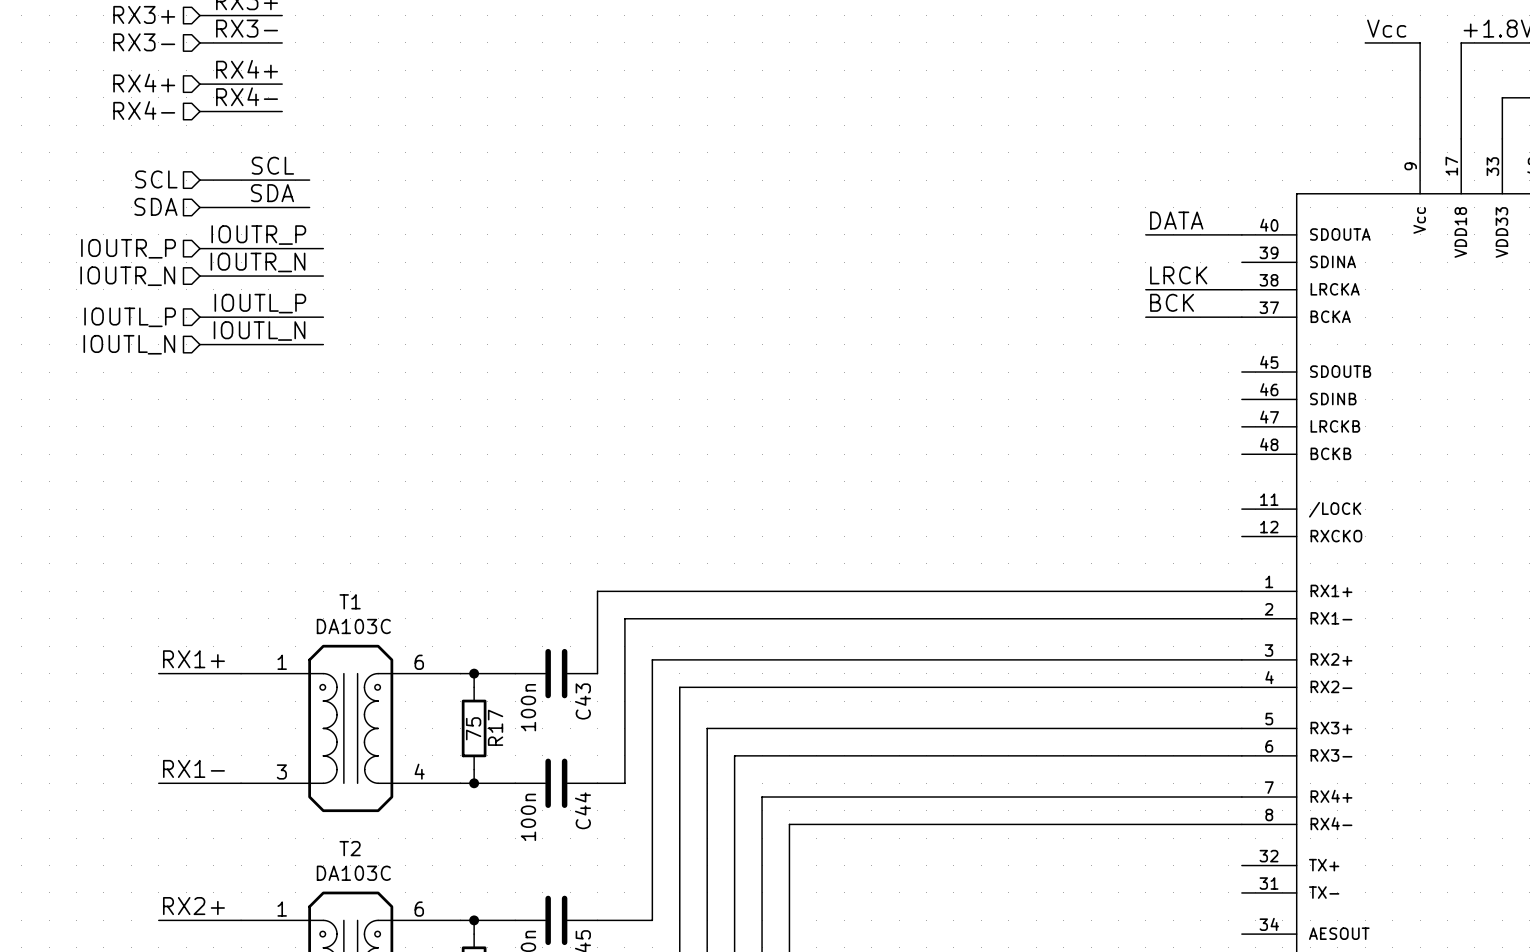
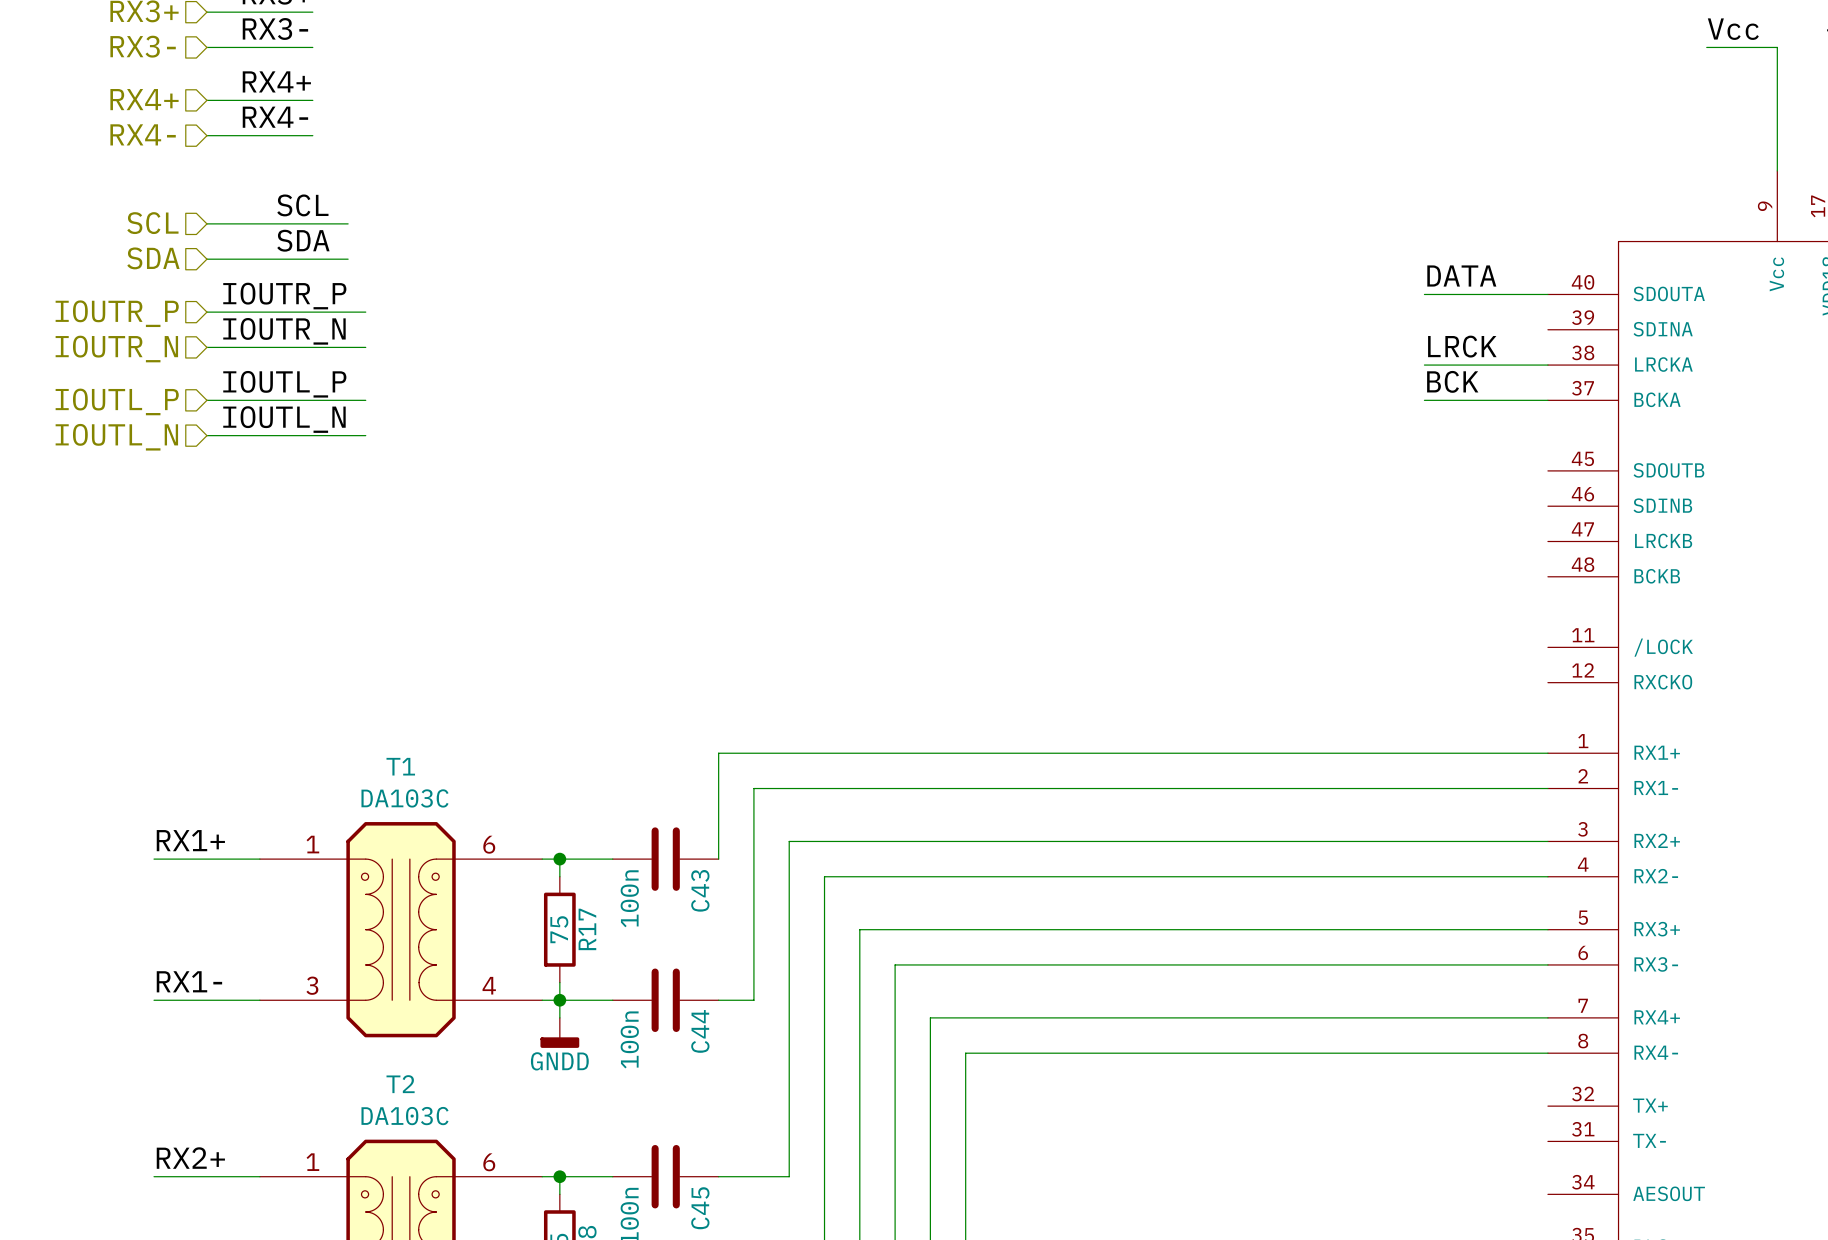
wire: none -> (559, 1000) (559, 1017)
power symbol: none -> GNDD (559, 1032)

